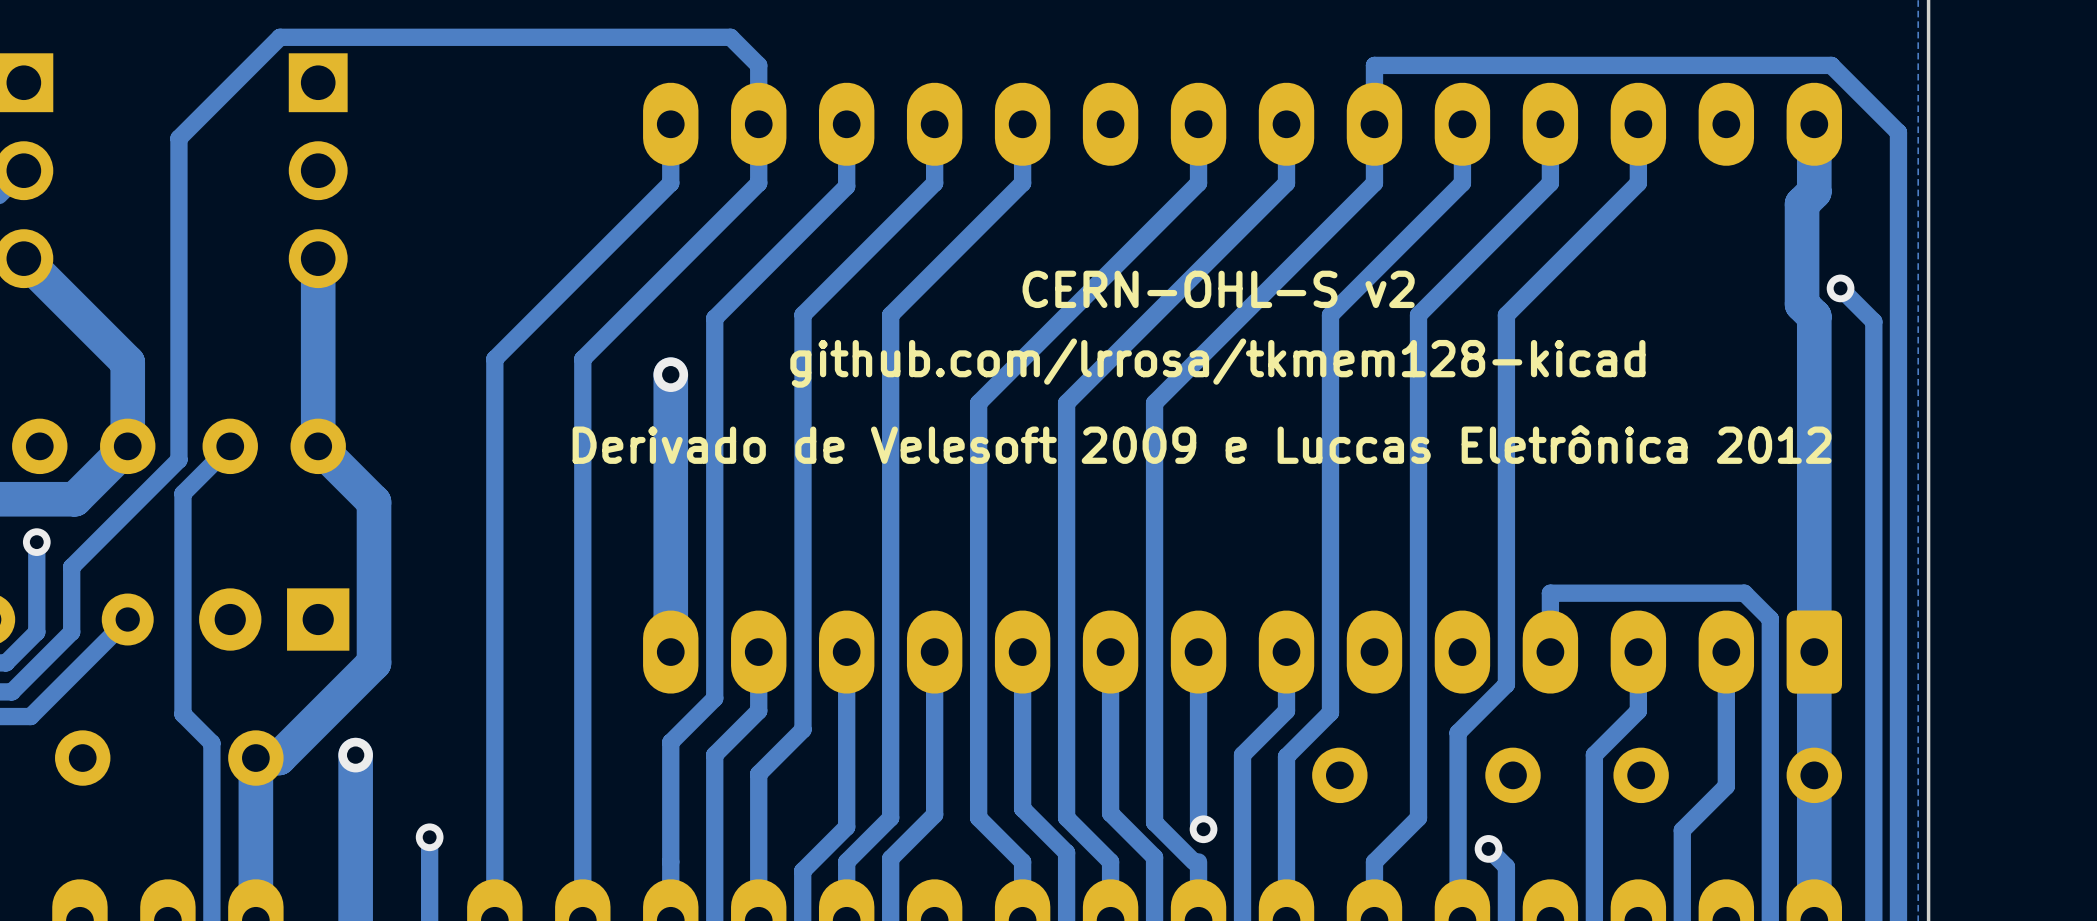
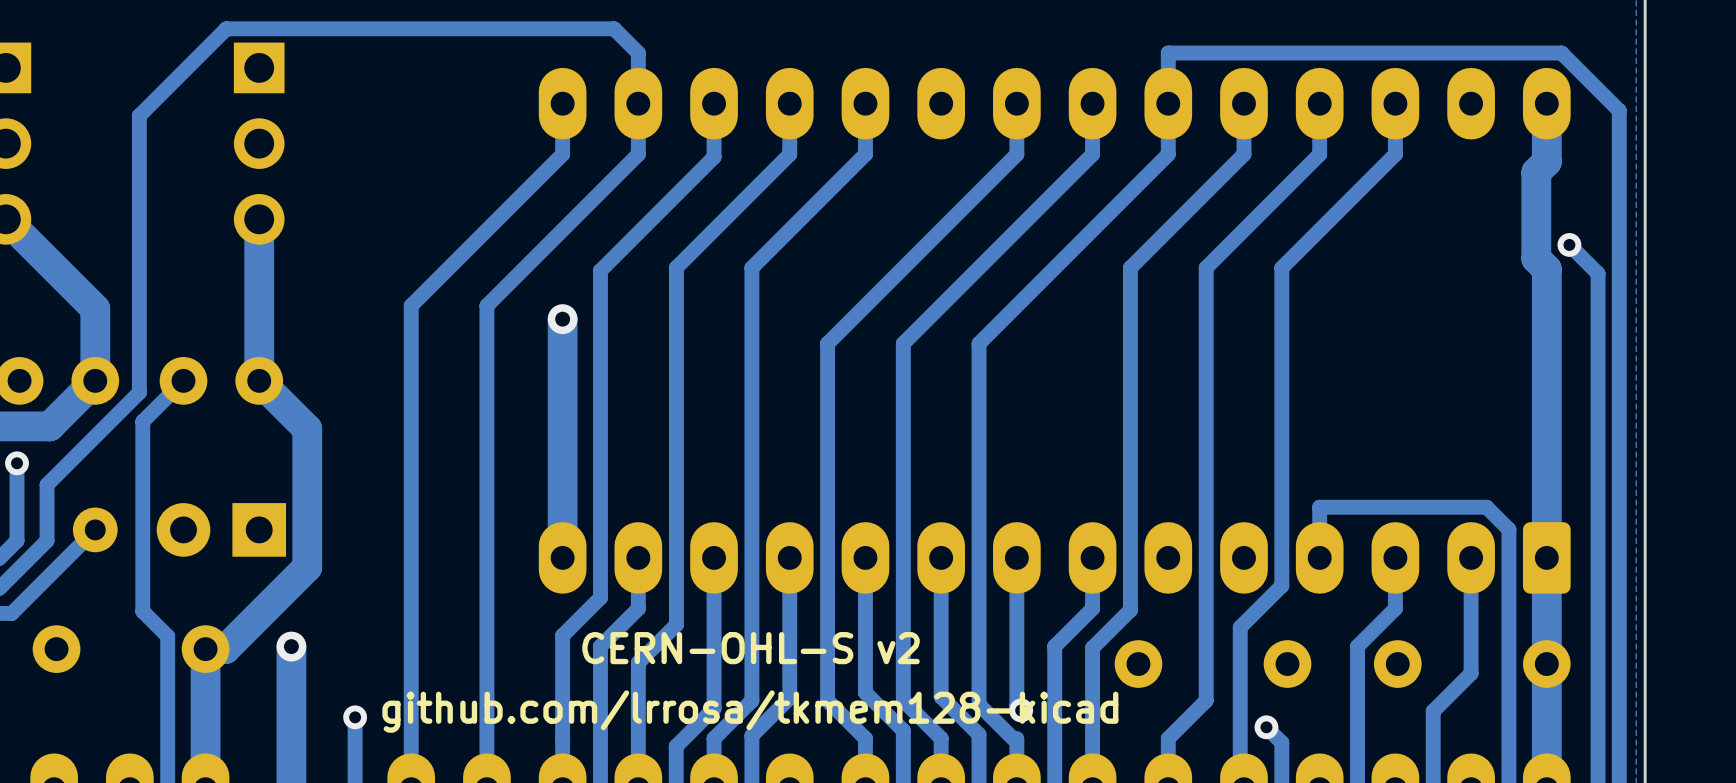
text position: CERN-OHL-S v2 (1218, 289) -> CERN-OHL-S v2 (751, 648)
text position: github.com/lrrosa/tkmem128-kicad (1217, 363) -> github.com/lrrosa/tkmem128-kicad (750, 711)
text: Derivado de Velesoft 2009 e Luccas Eletrônica 2012 (1202, 444) -> none

